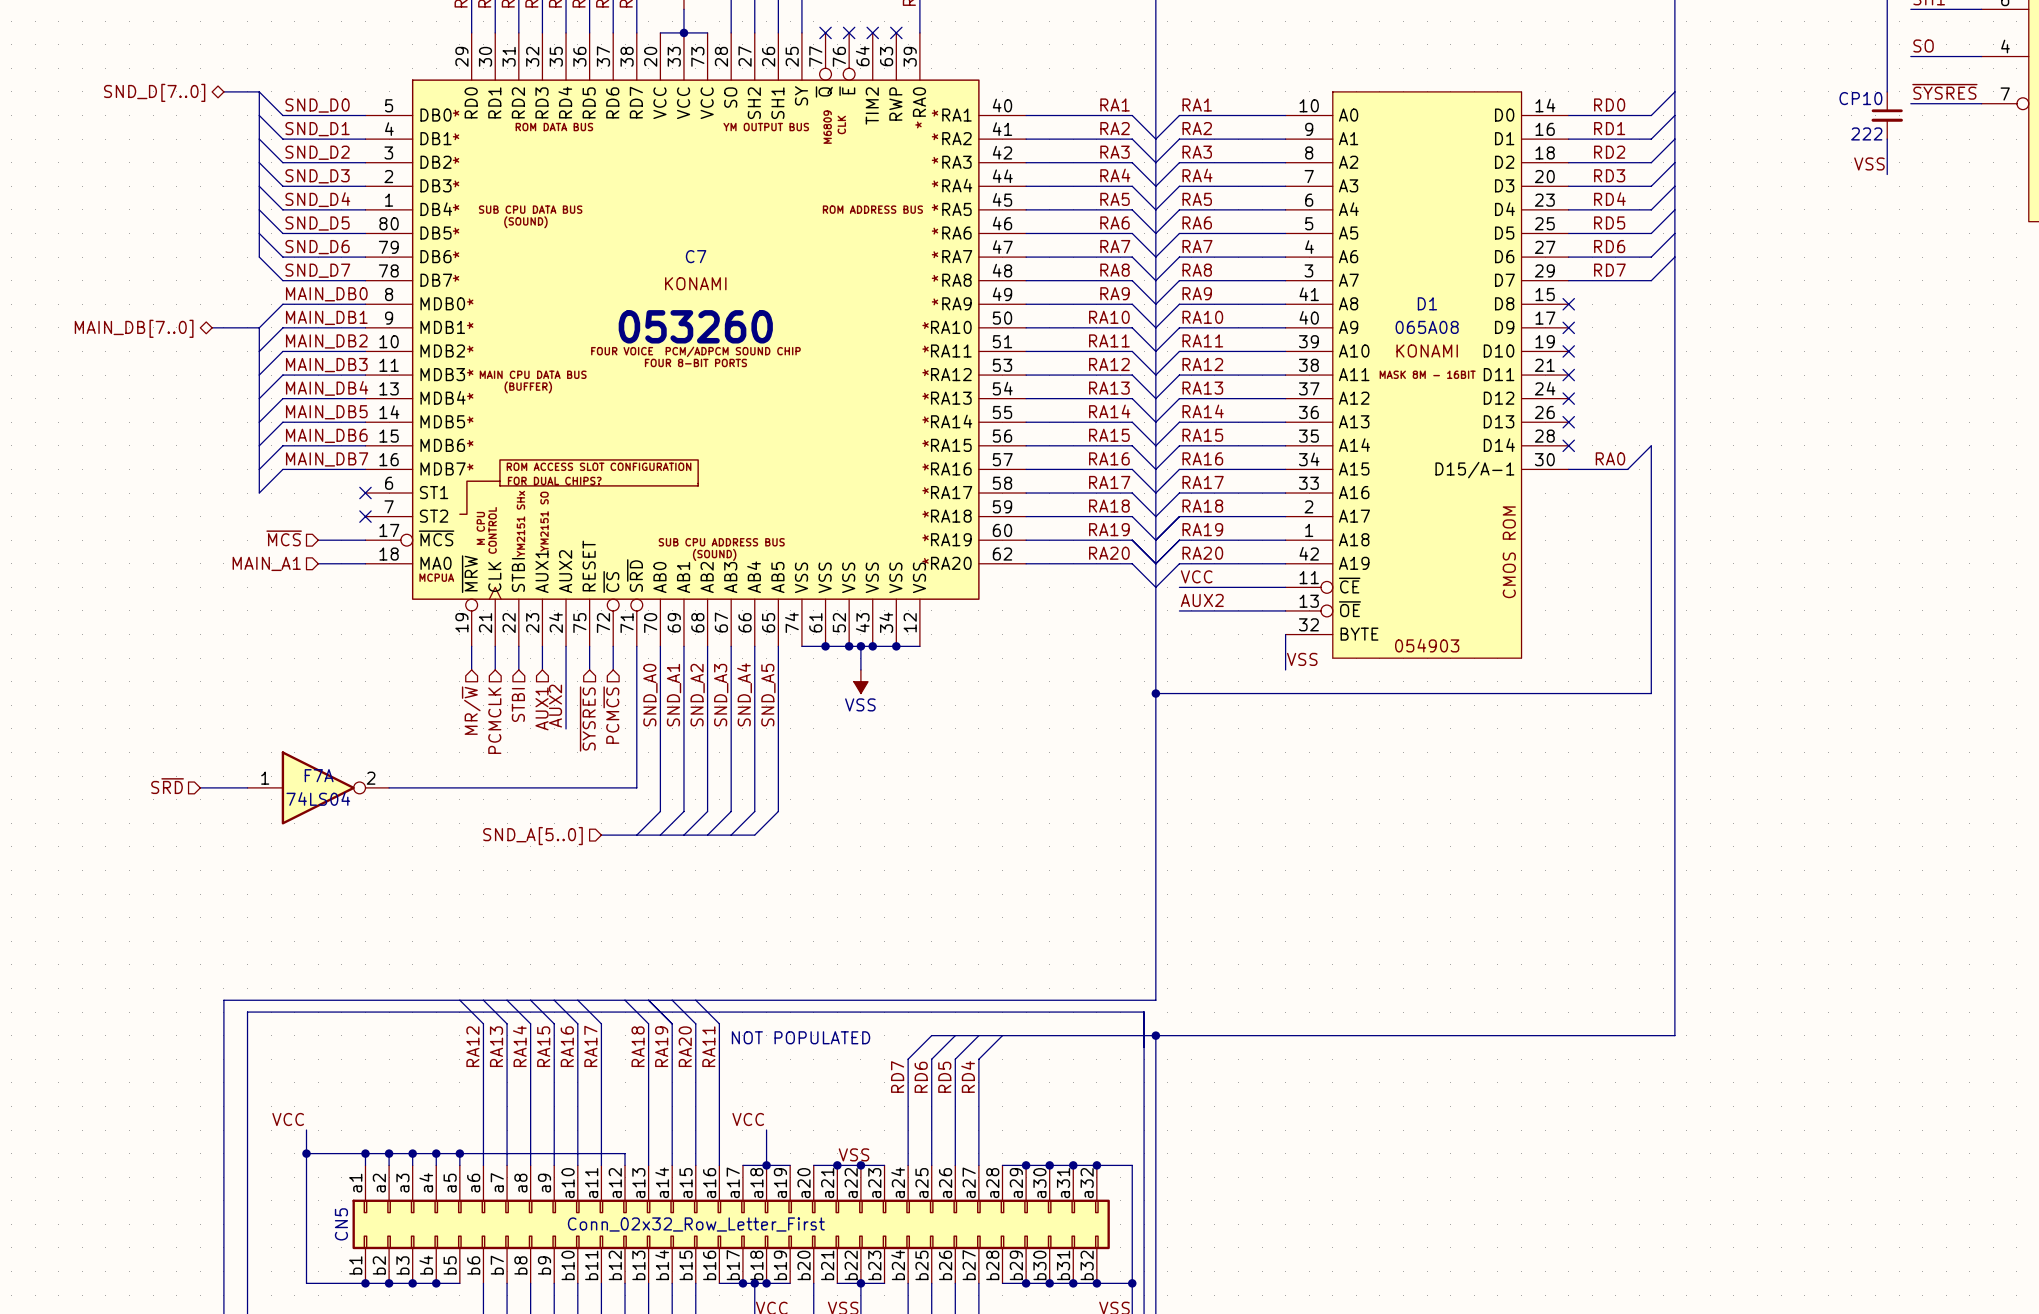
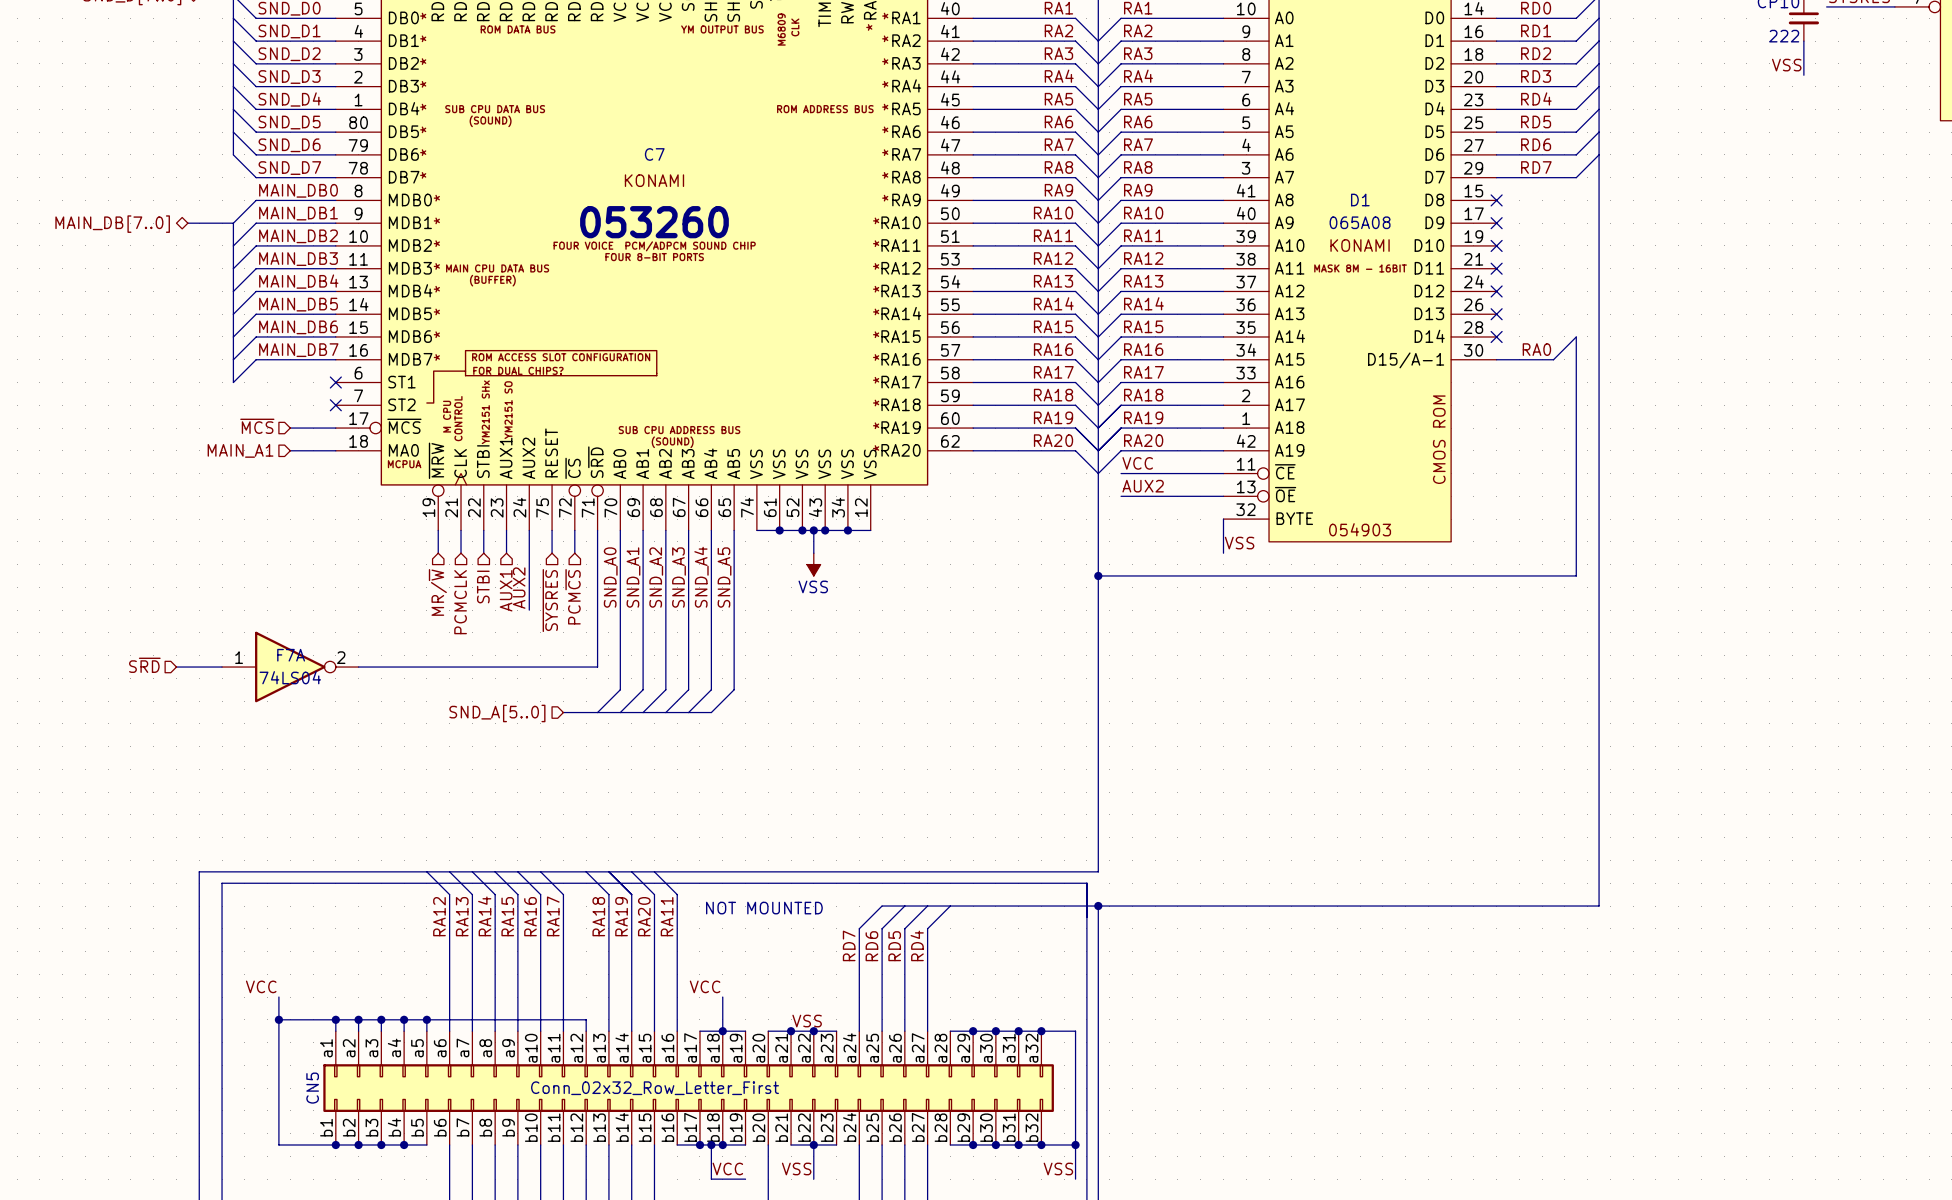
text: NOT POPULATED (801, 1037) -> NOT MOUNTED (764, 908)

